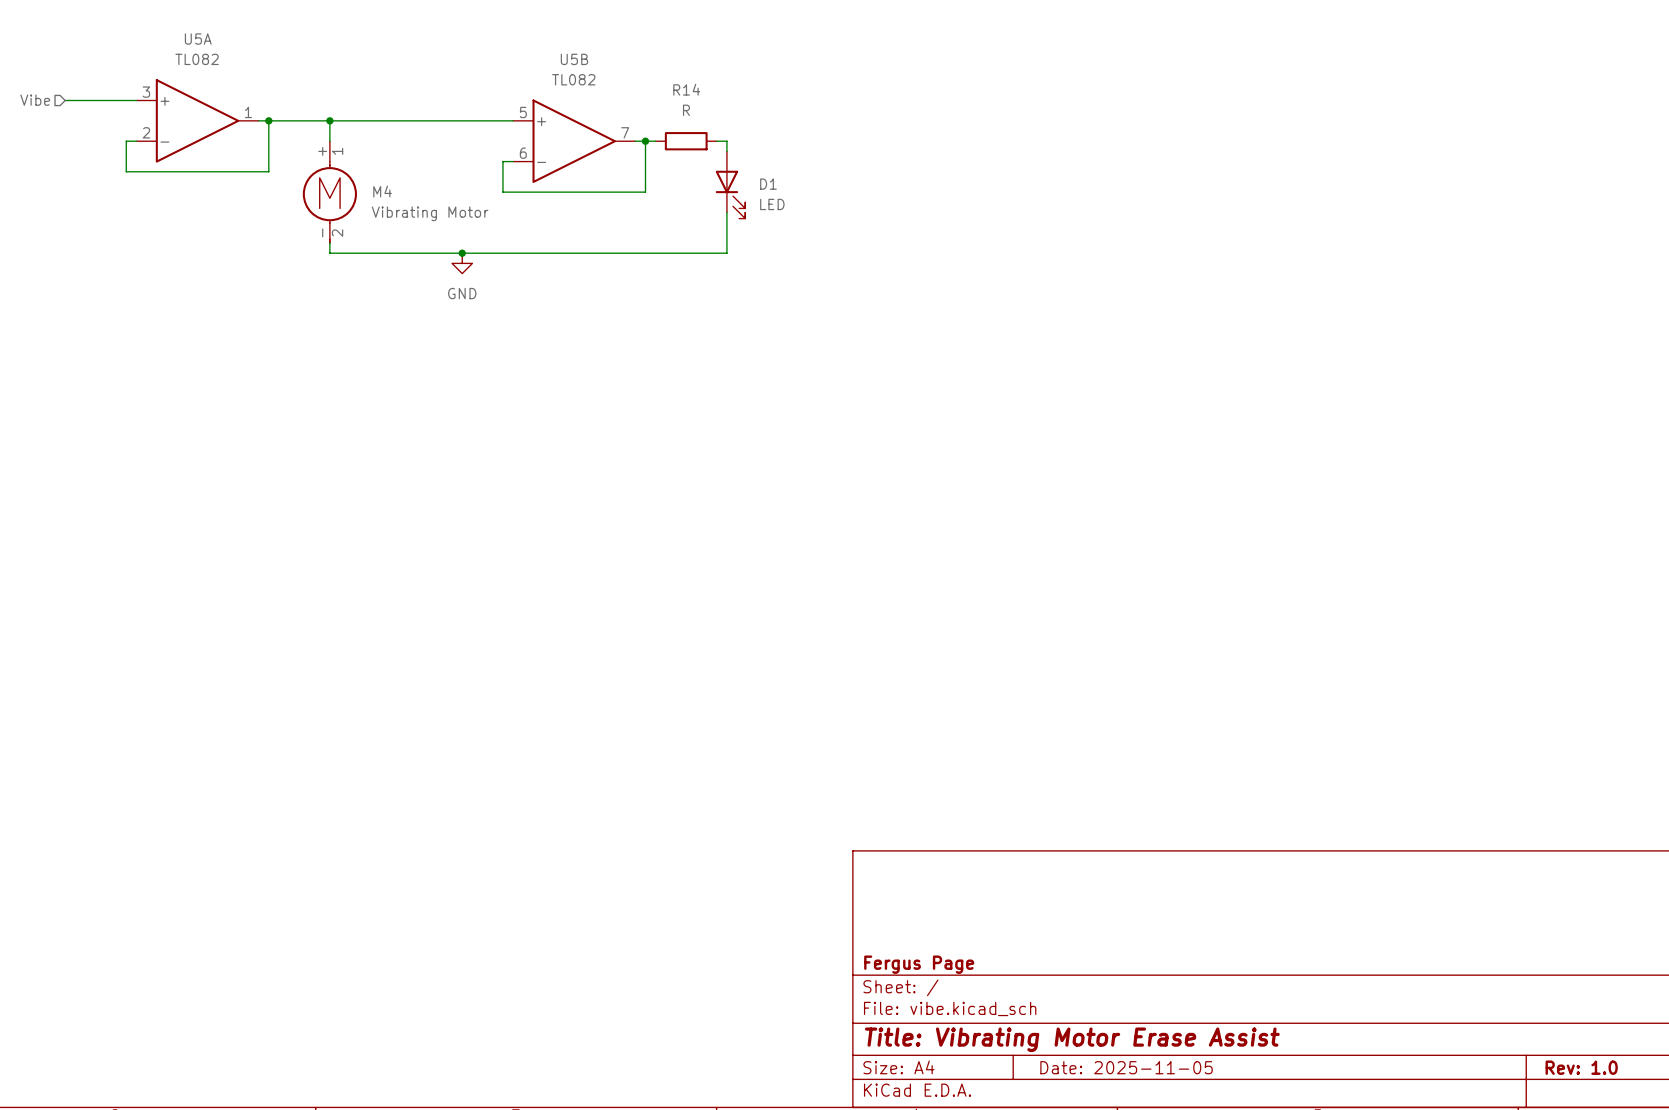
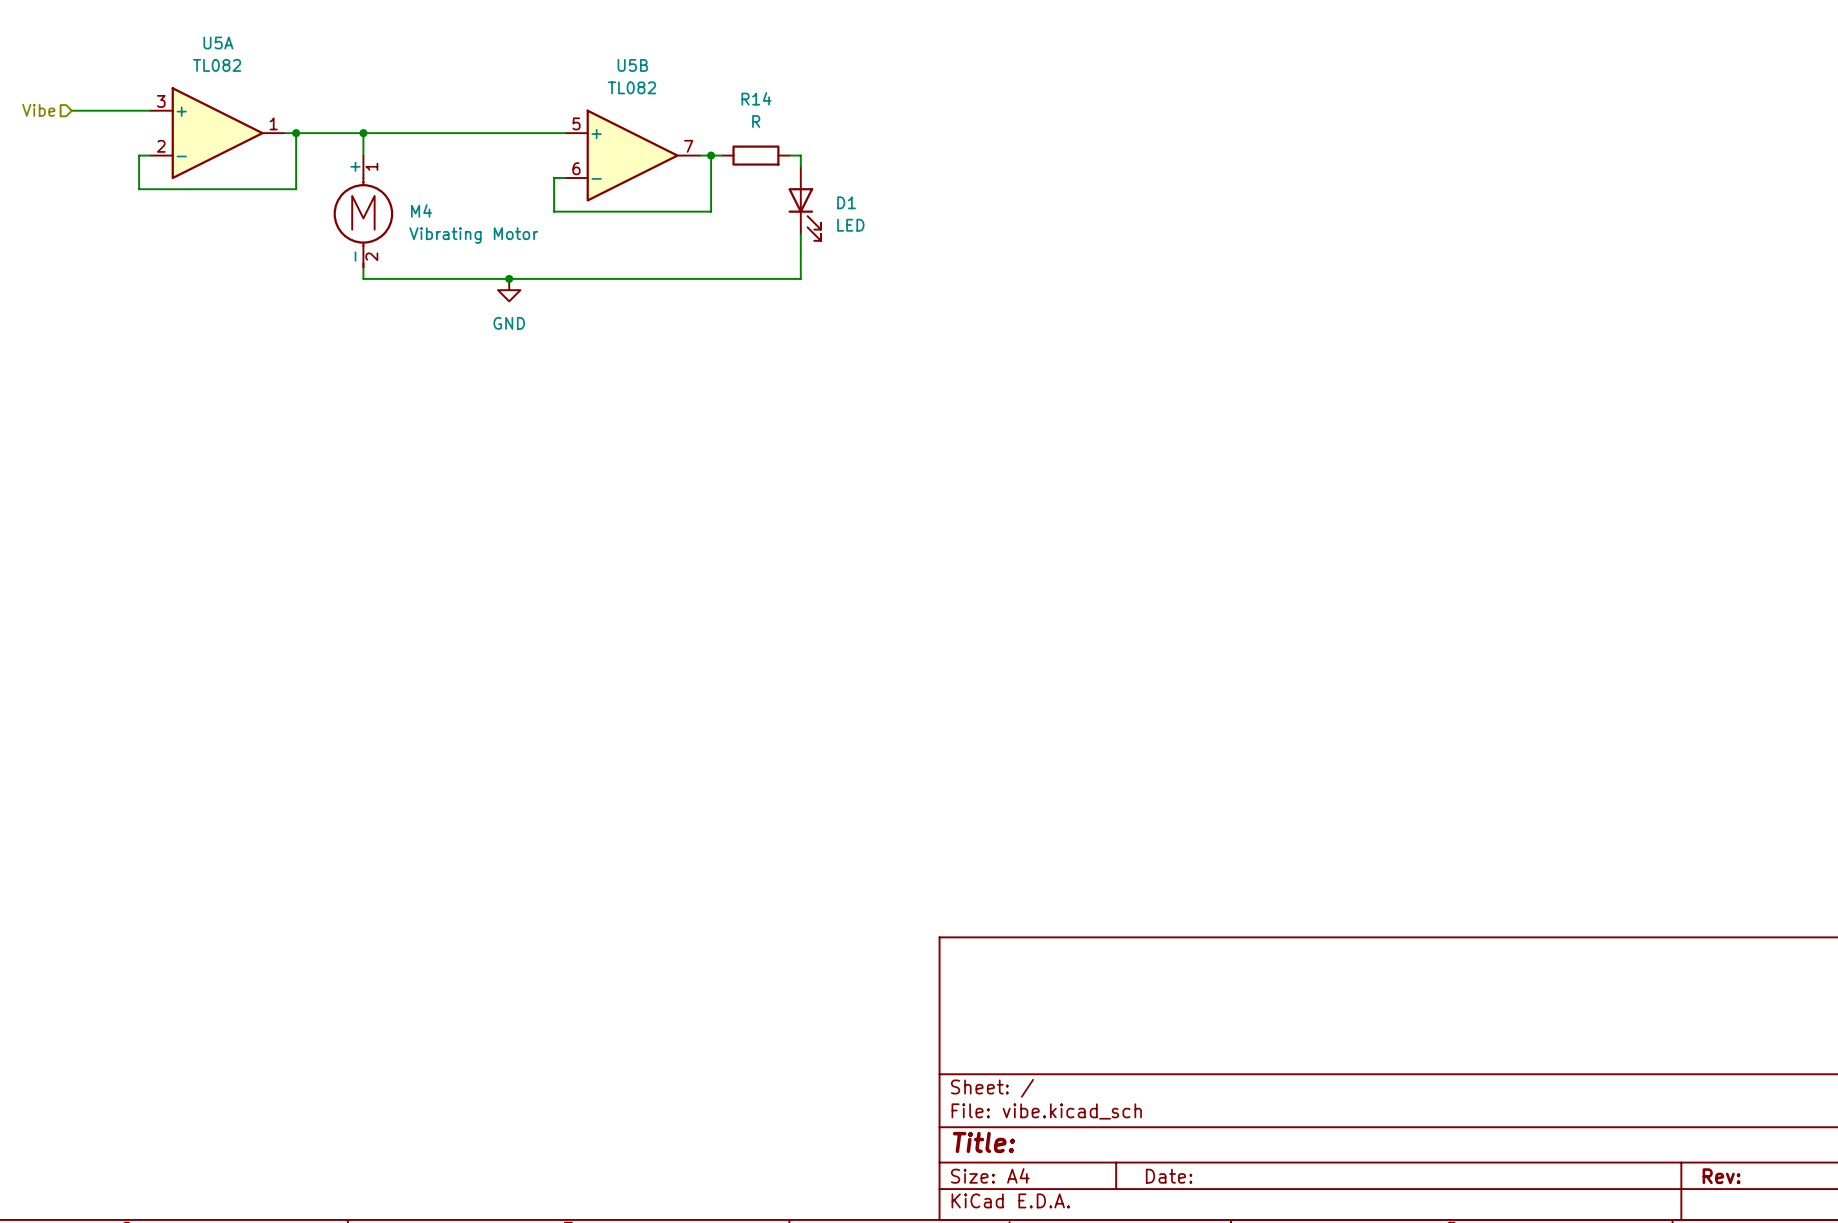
title block: Fergus Page (919, 964) -> none
title block: Title: Vibrating Motor Erase Assist (1072, 1039) -> Title: (983, 1142)
title block: Date: 2025-11-05 (1126, 1067) -> Date: (1169, 1176)
title block: Rev: 1.0 (1581, 1067) -> Rev: (1721, 1176)

